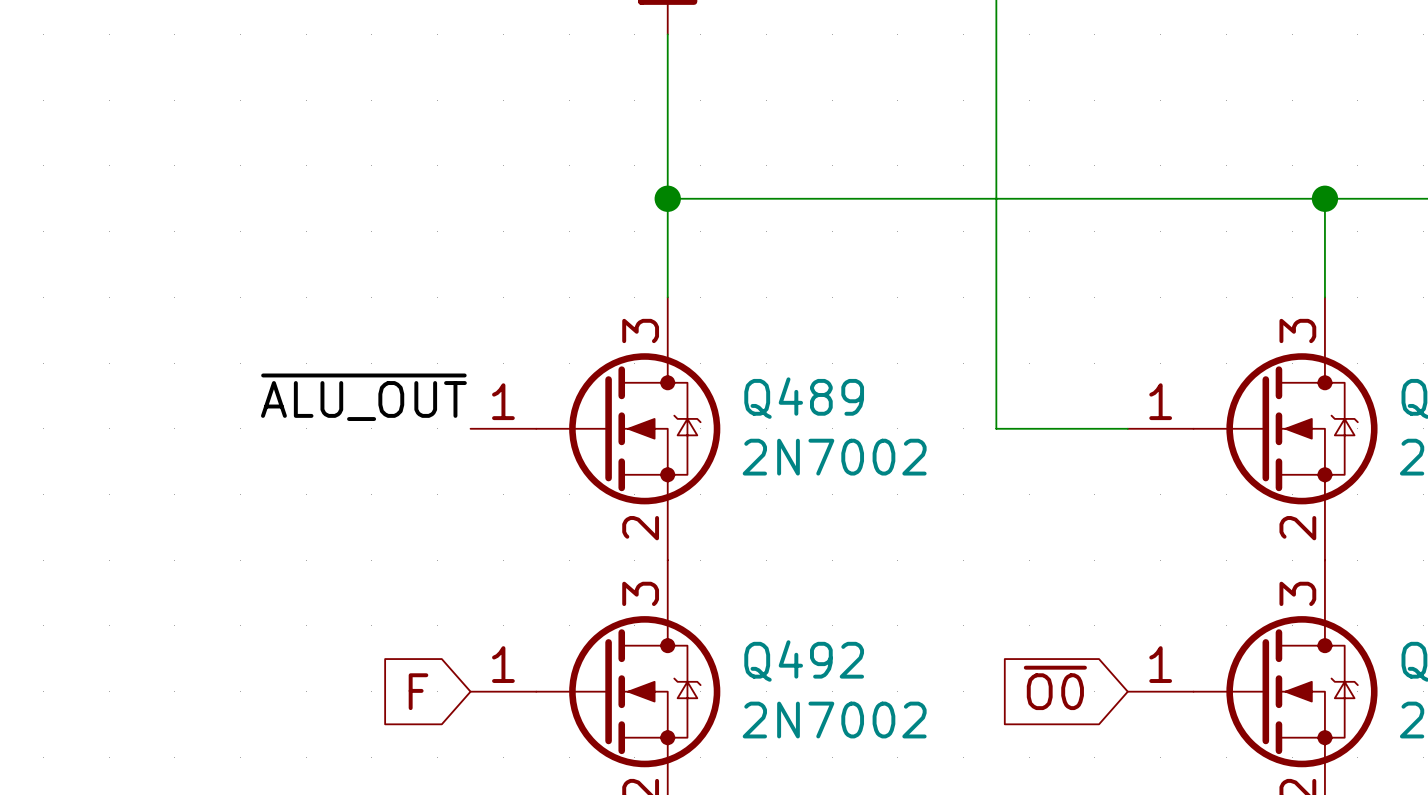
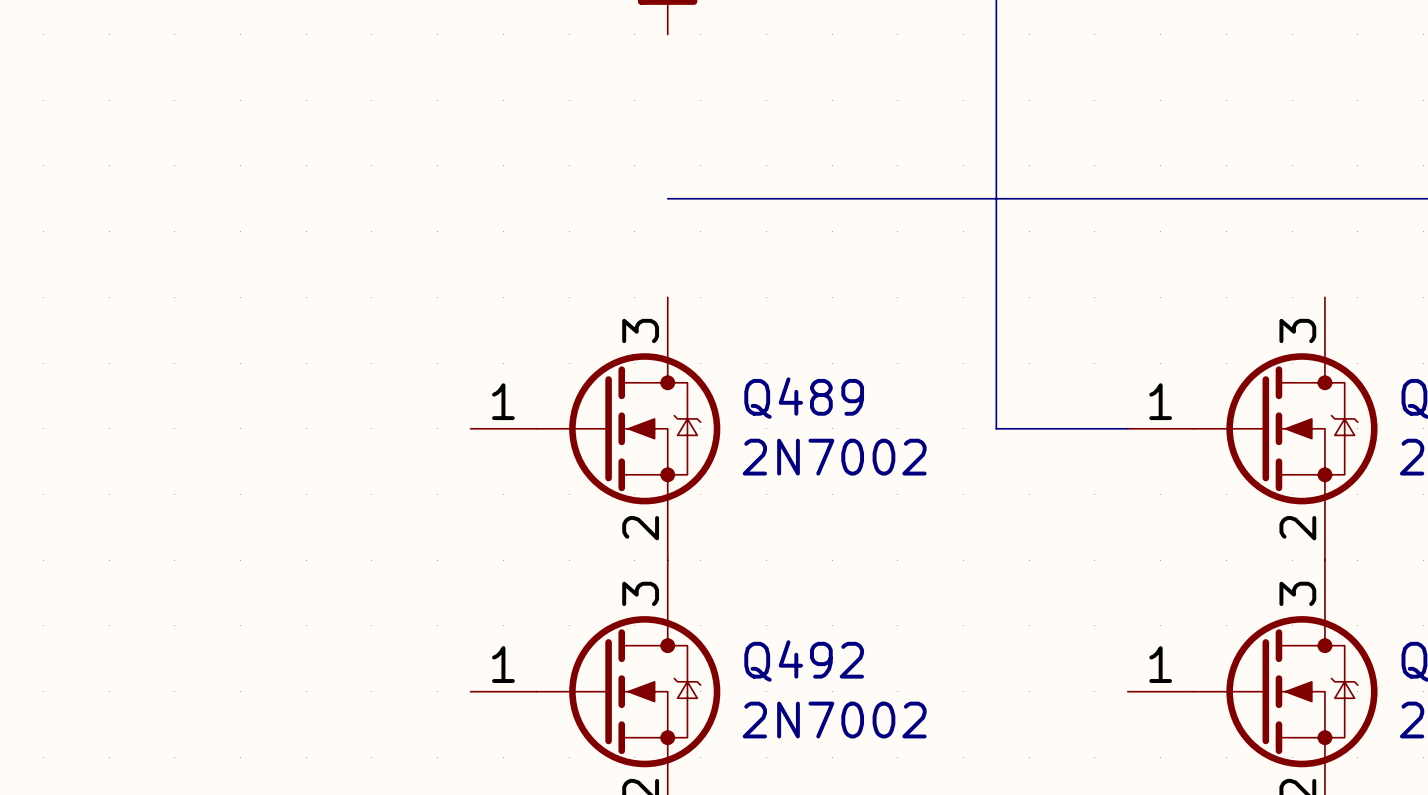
wire: (667, 34) (667, 297) -> none
junction: (667, 198) -> none
wire: (1324, 198) (1324, 297) -> none
junction: (1324, 198) -> none
label: ~{ALU_OUT} (363, 397) -> none
global label: ~{O0} (1055, 687) -> none
global label: F (418, 691) -> none

